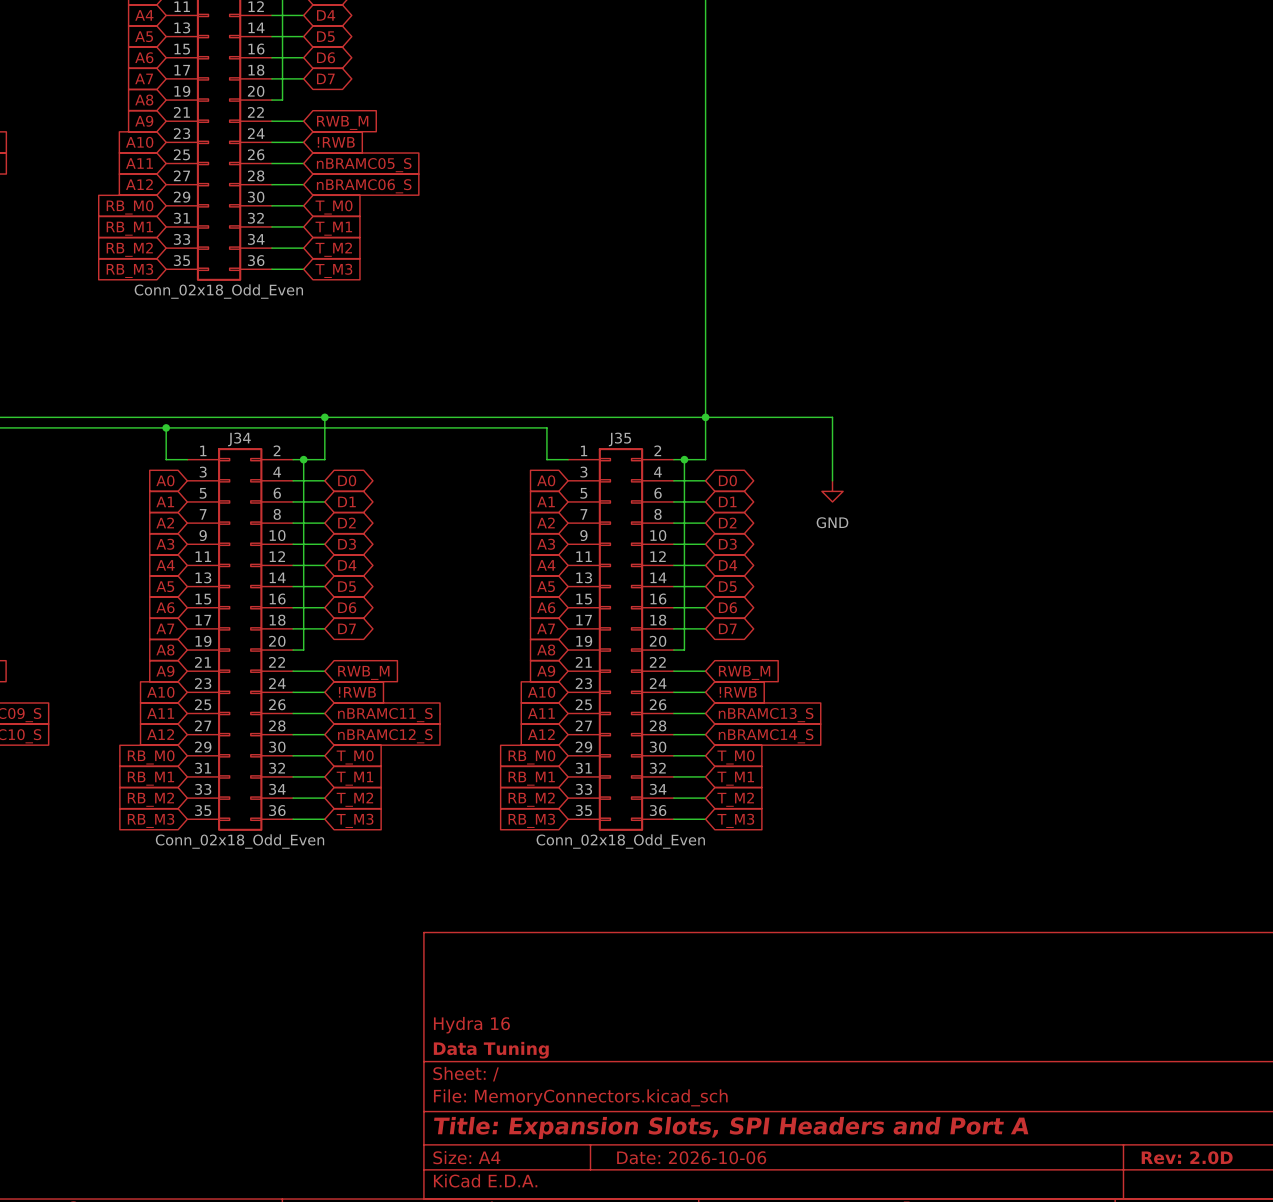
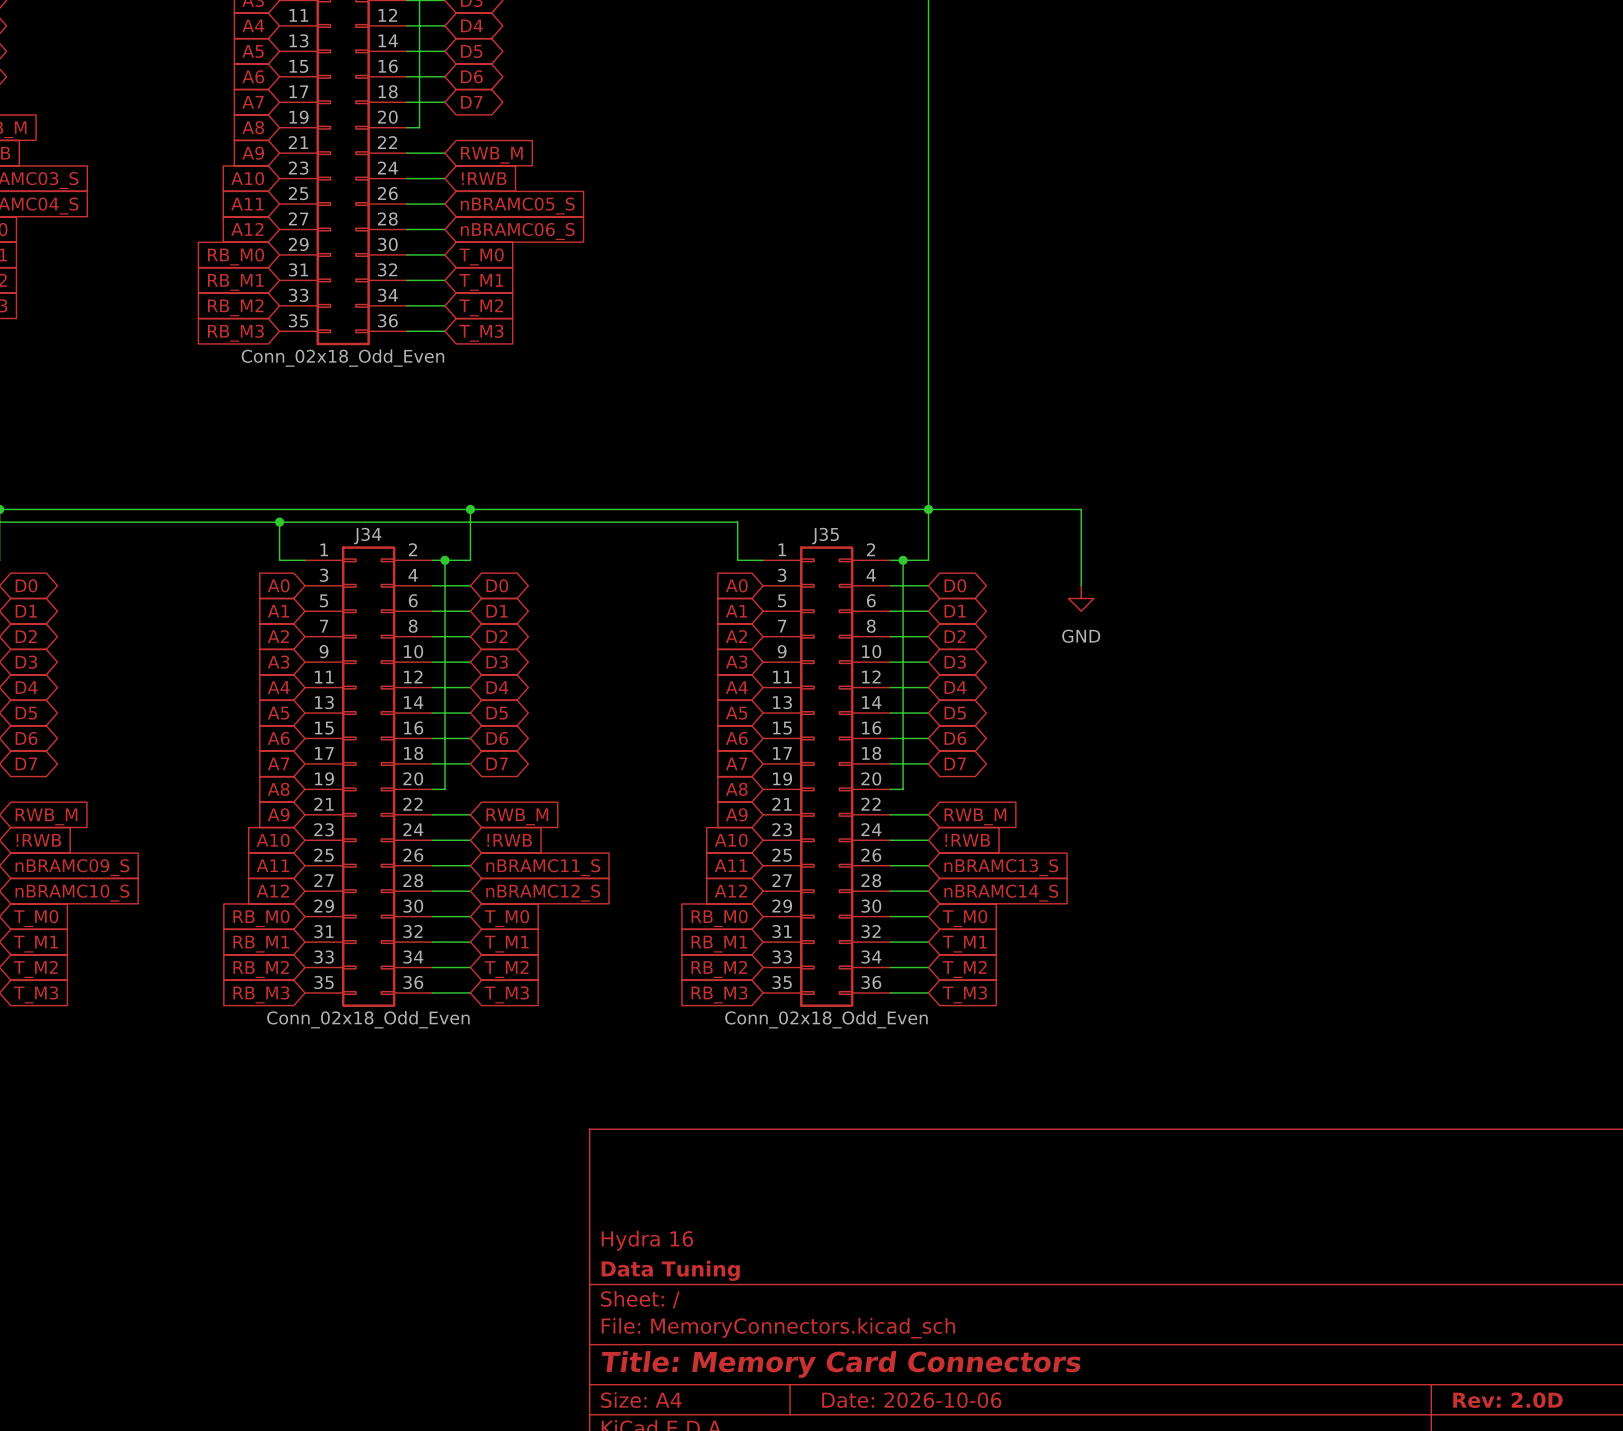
title block: Title: Expansion Slots, SPI Headers and Port A (731, 1127) -> Title: Memory Card Connectors (841, 1364)

